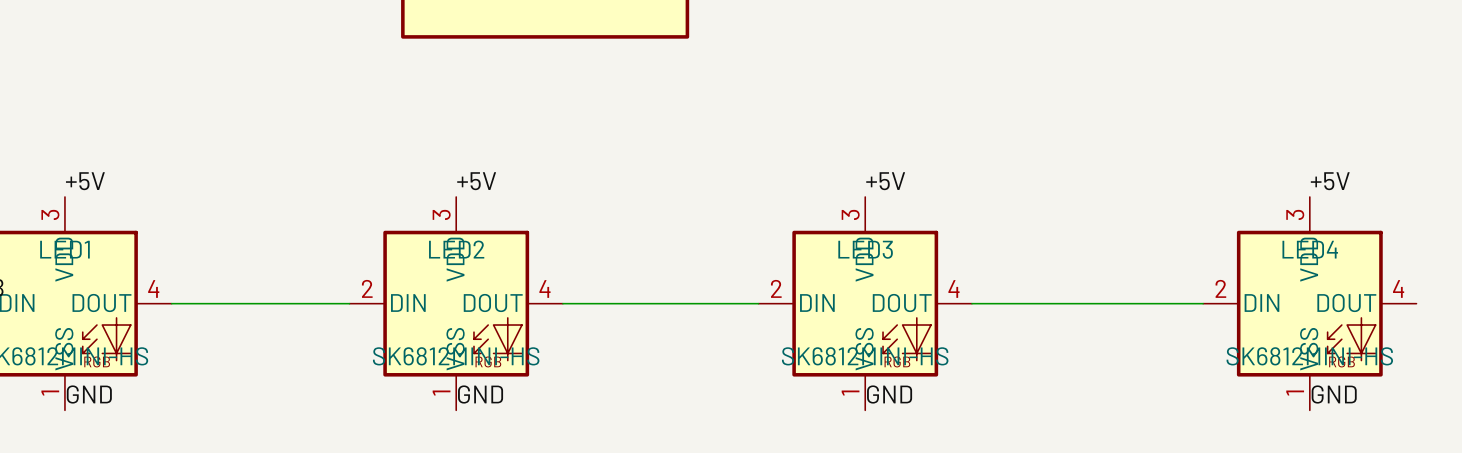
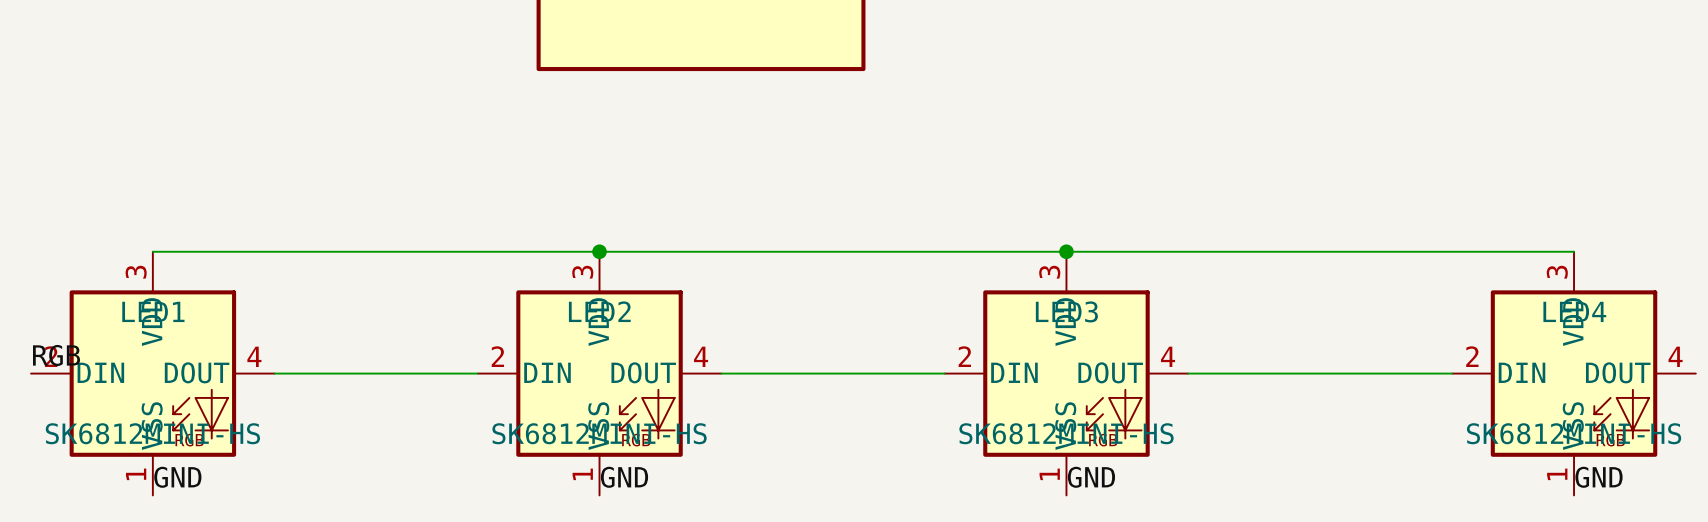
label: +5V (85, 181) -> none
label: +5V (476, 181) -> none
label: +5V (885, 181) -> none
label: +5V (1330, 181) -> none
wire: none -> (152, 251) (1574, 251)
junction: none -> (599, 251)
junction: none -> (1066, 251)

